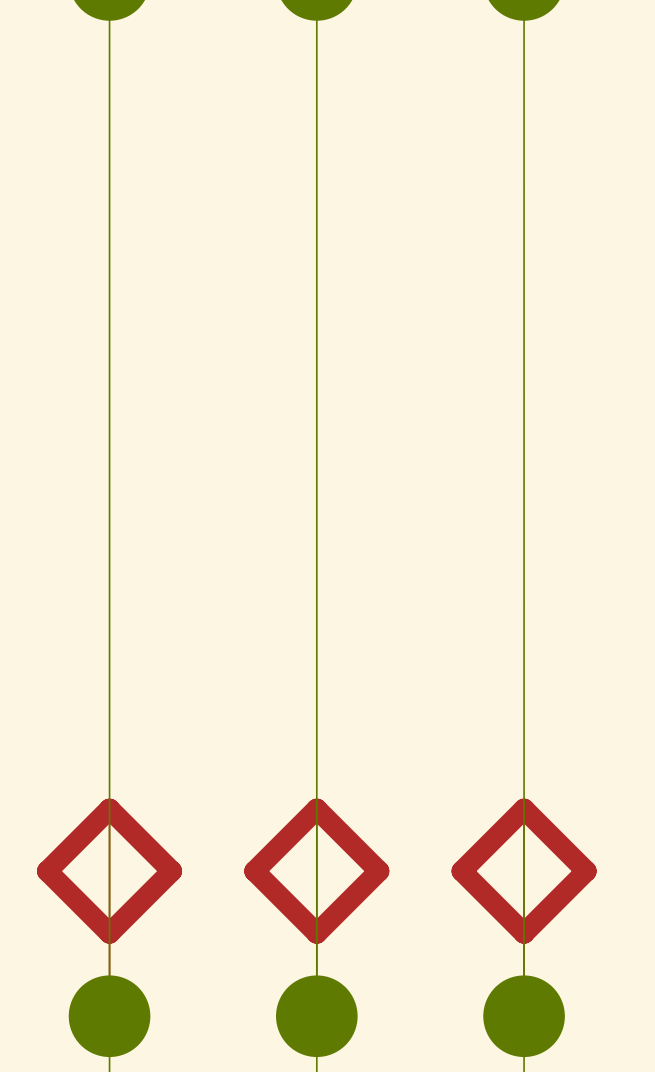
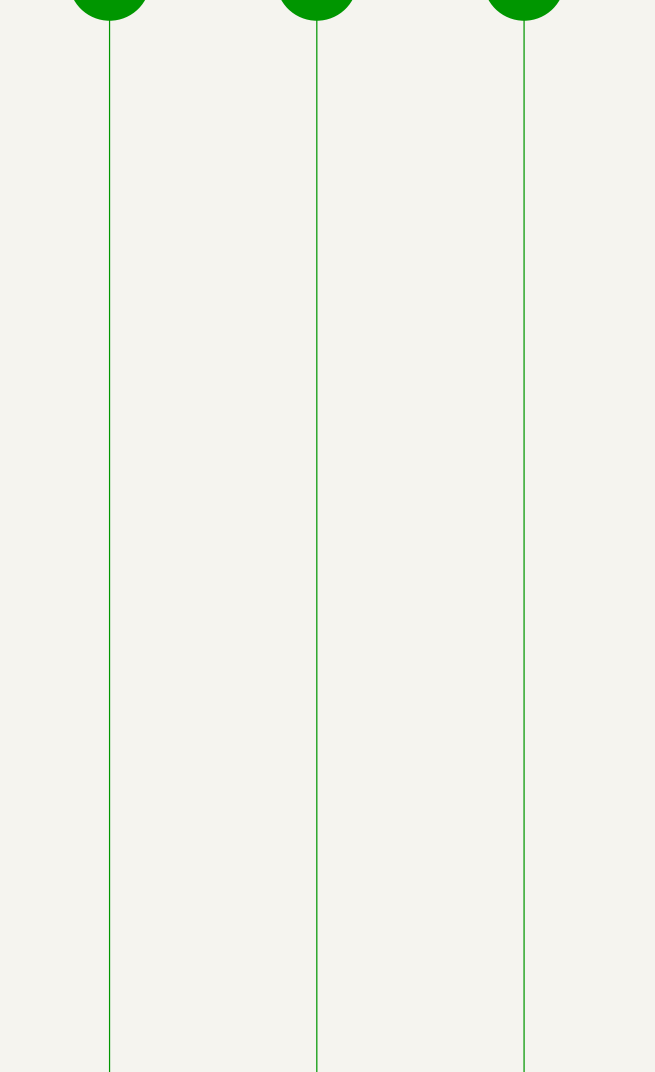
part: (109, 907) -> none
part: (316, 907) -> none
part: (524, 907) -> none
junction: (109, 1016) -> none
junction: (316, 1016) -> none
junction: (524, 1016) -> none

